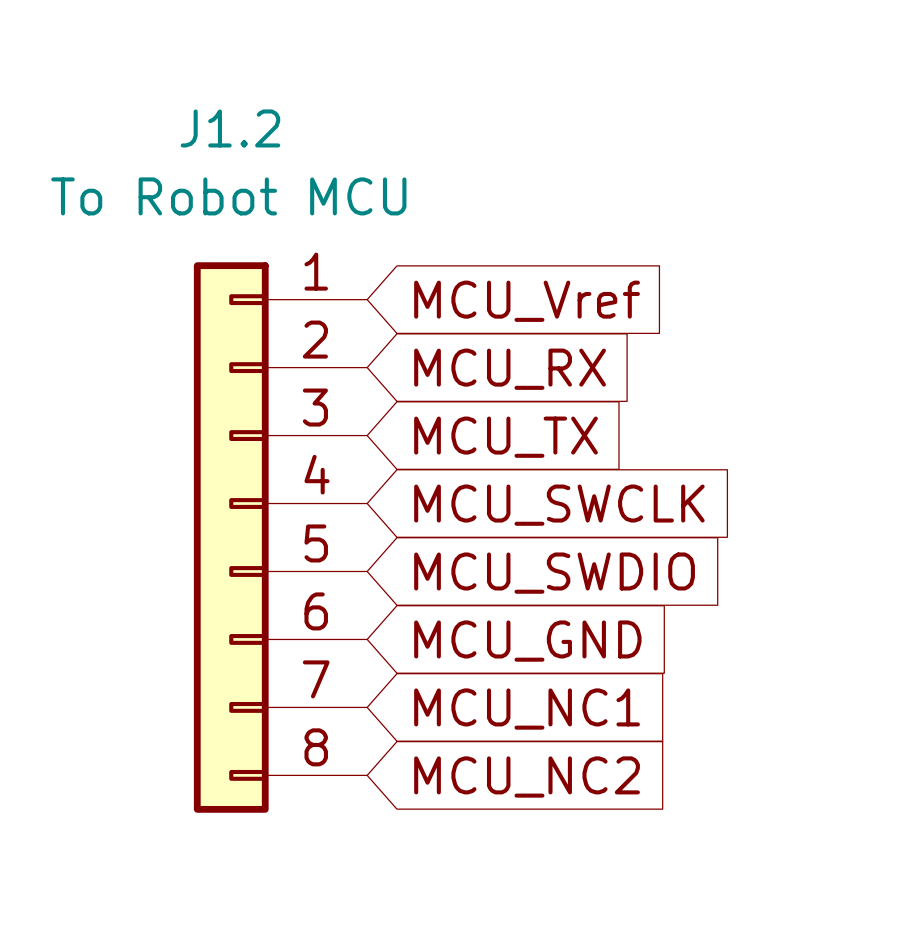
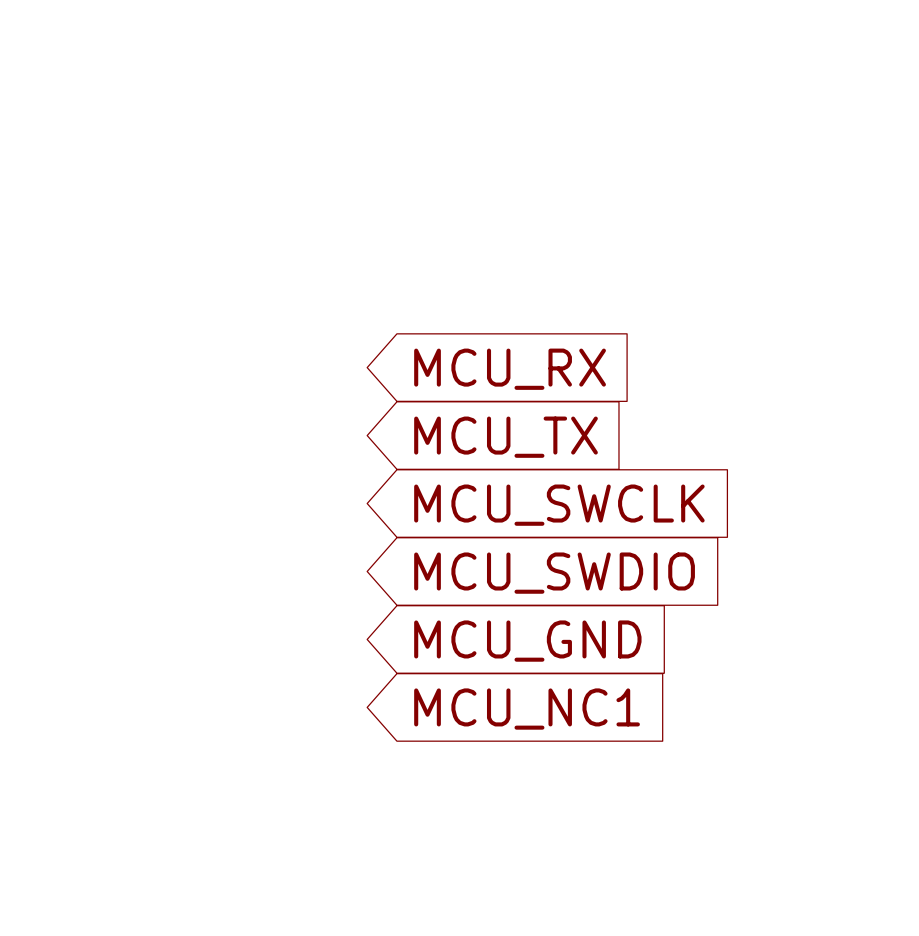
global label: MCU_Vref (527, 301) -> none
J1.2: To Robot MCU (280, 537) -> none
global label: MCU_NC2 (527, 777) -> none

